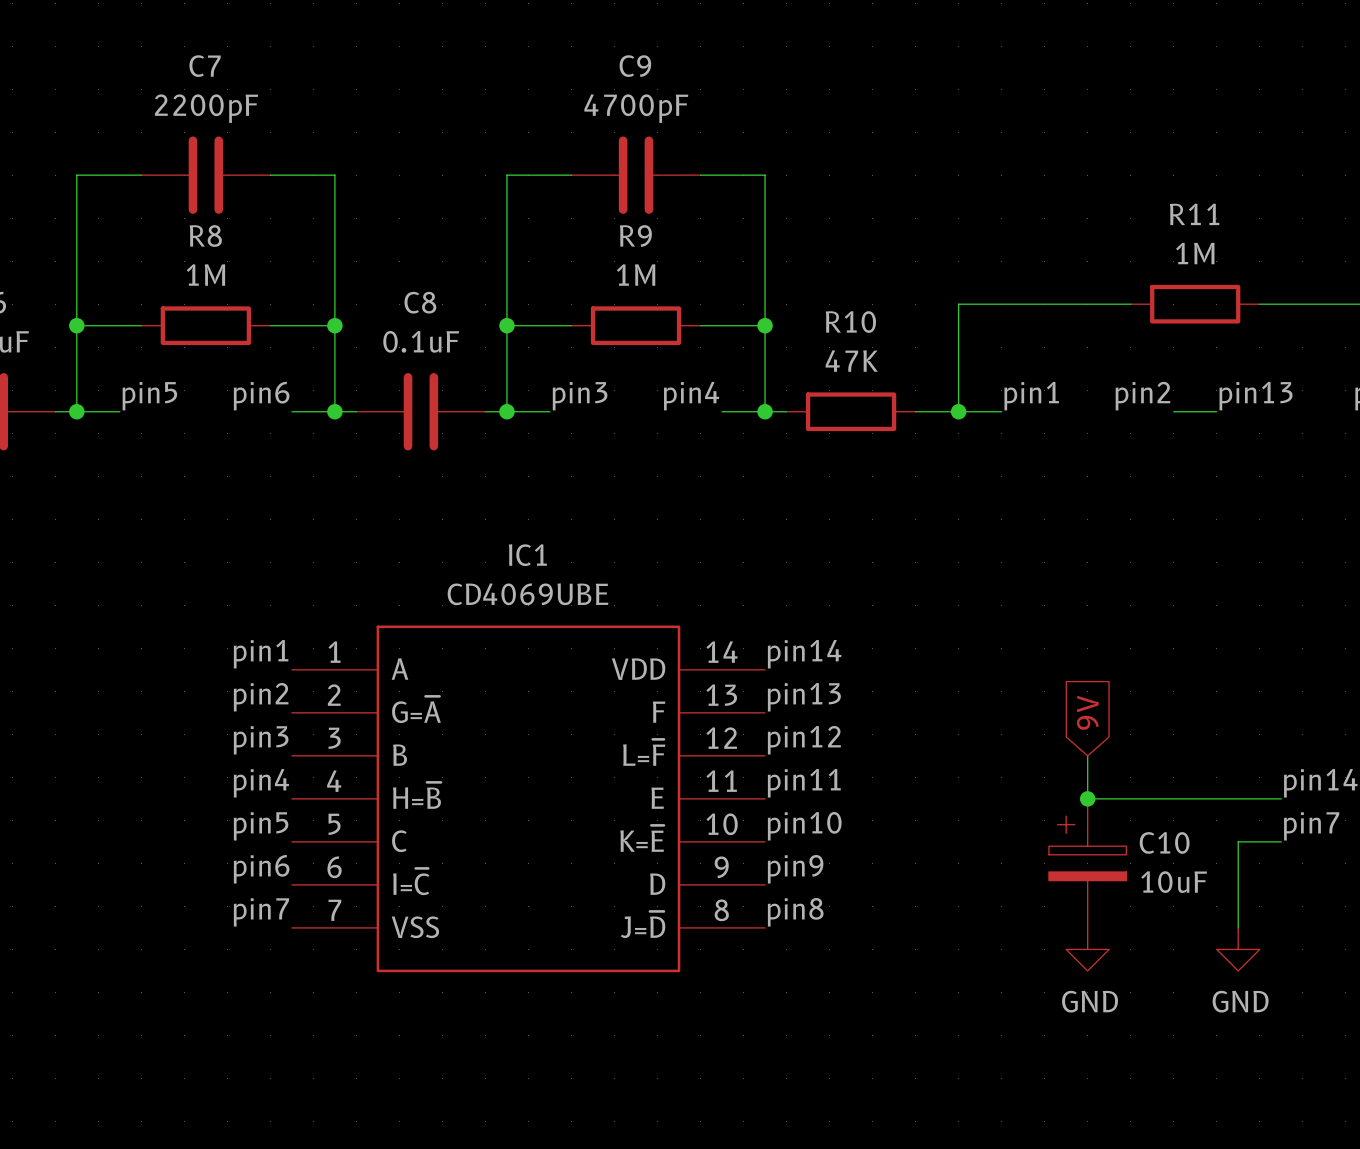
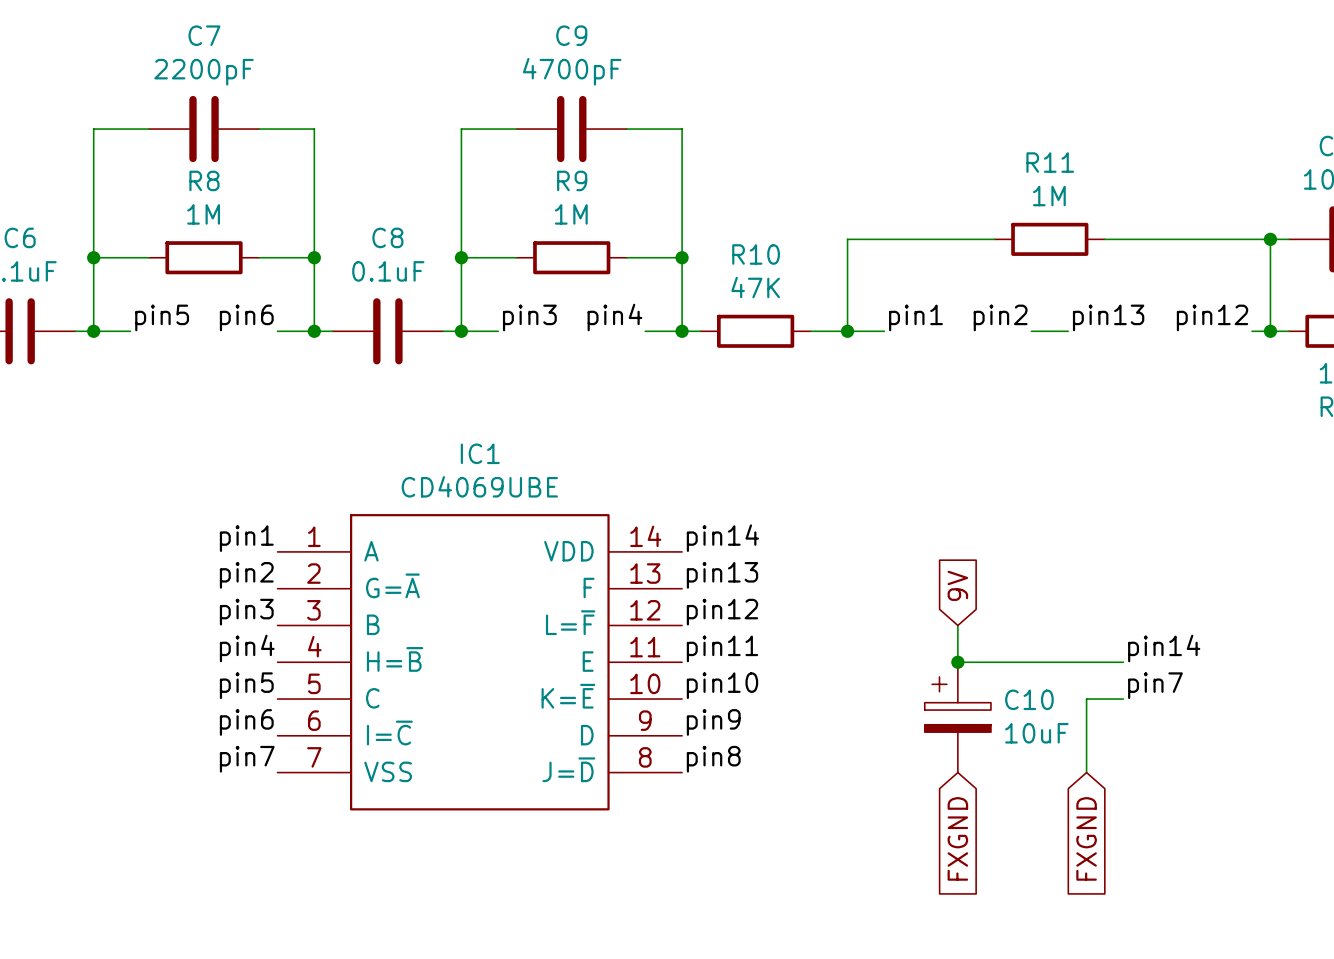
power symbol: GND (1087, 949) -> none
power symbol: GND (1238, 949) -> none
global label: none -> FXGND (957, 838)
global label: none -> FXGND (1086, 838)

